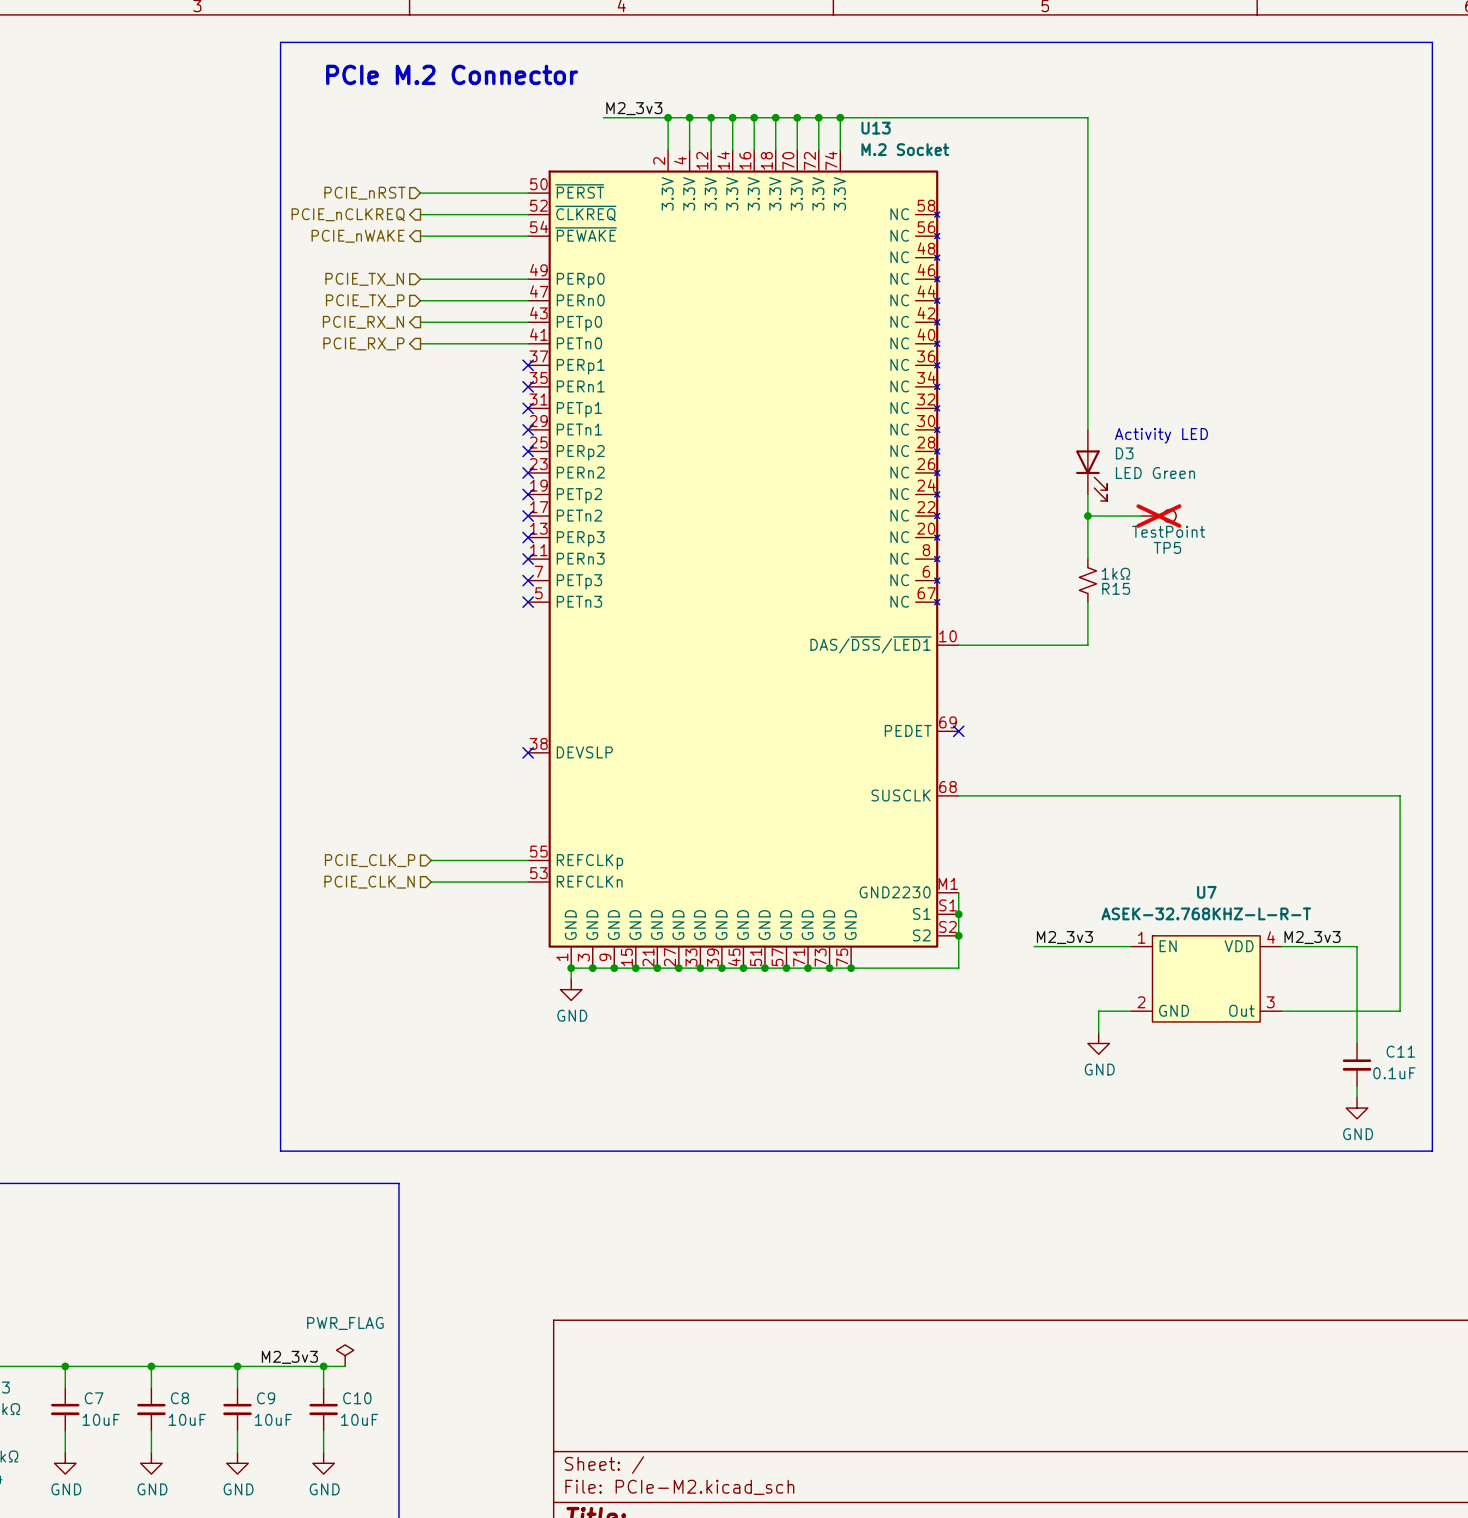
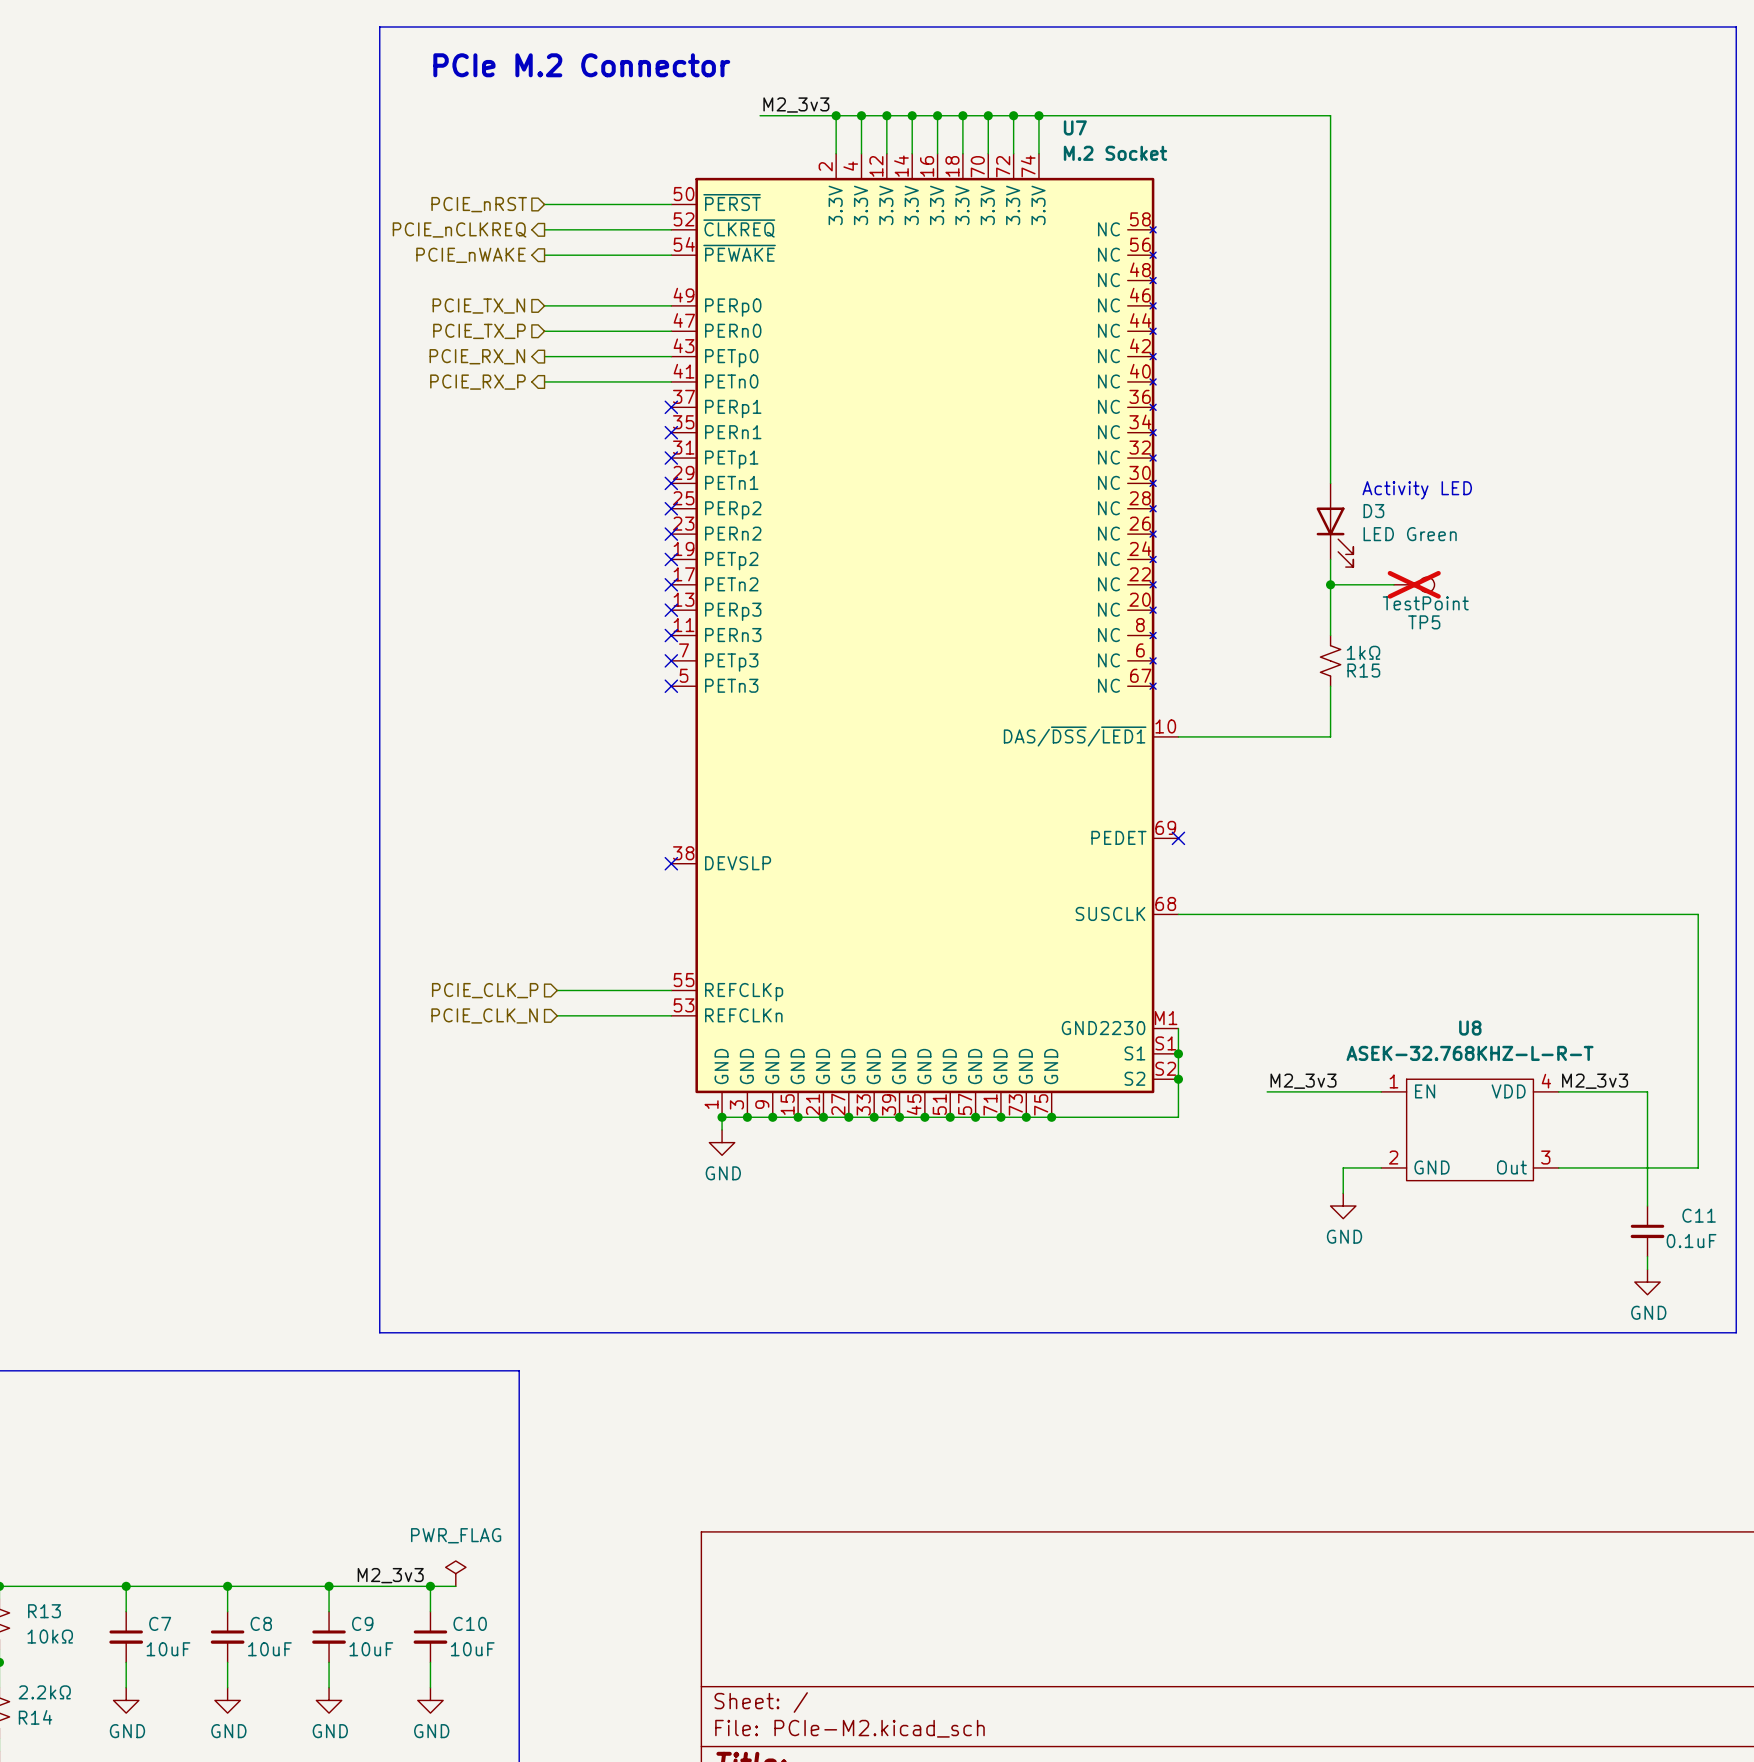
U13 name: U13 (876, 128) -> U7 (1075, 127)
U7: ASEK-32.768KHZ-L-R-T (1206, 978) -> none
U8: none -> ASEK-32.768KHZ-L-R-T (1470, 1129)

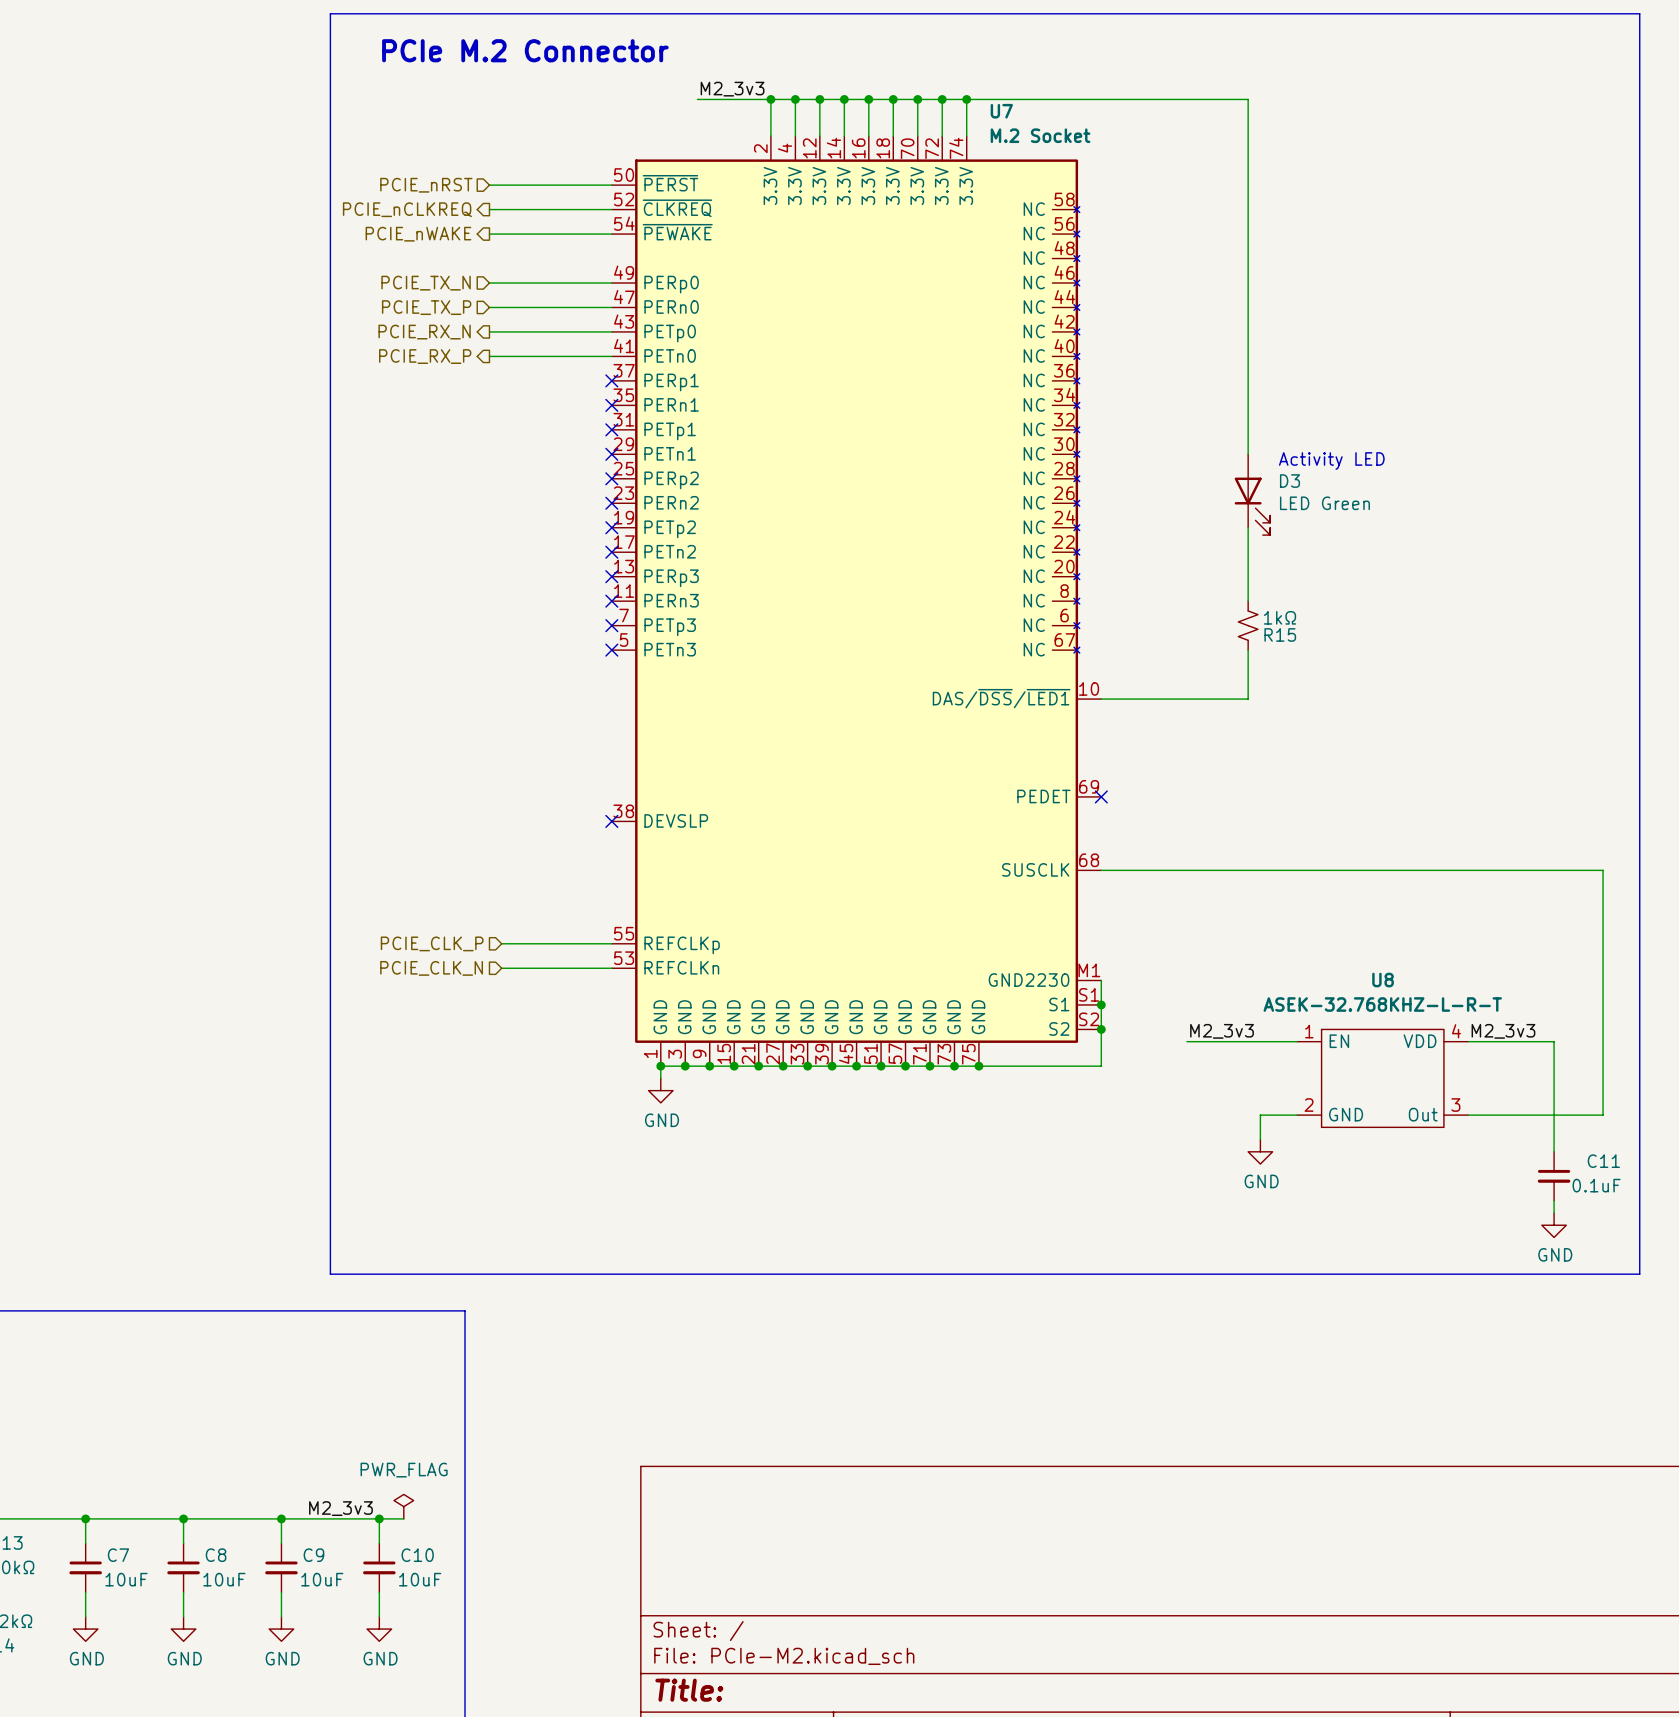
wire: (1330, 584) (1393, 584) -> none
junction: (1330, 584) -> none
TP5: TestPoint (1414, 584) -> none

